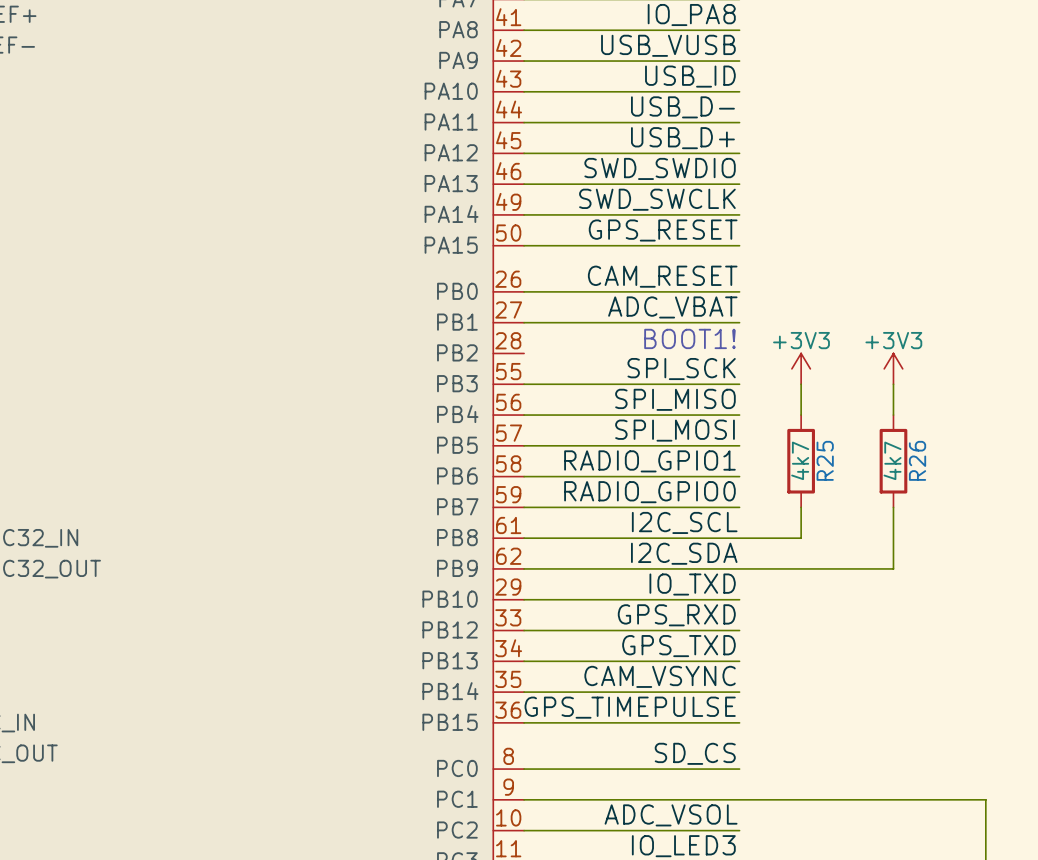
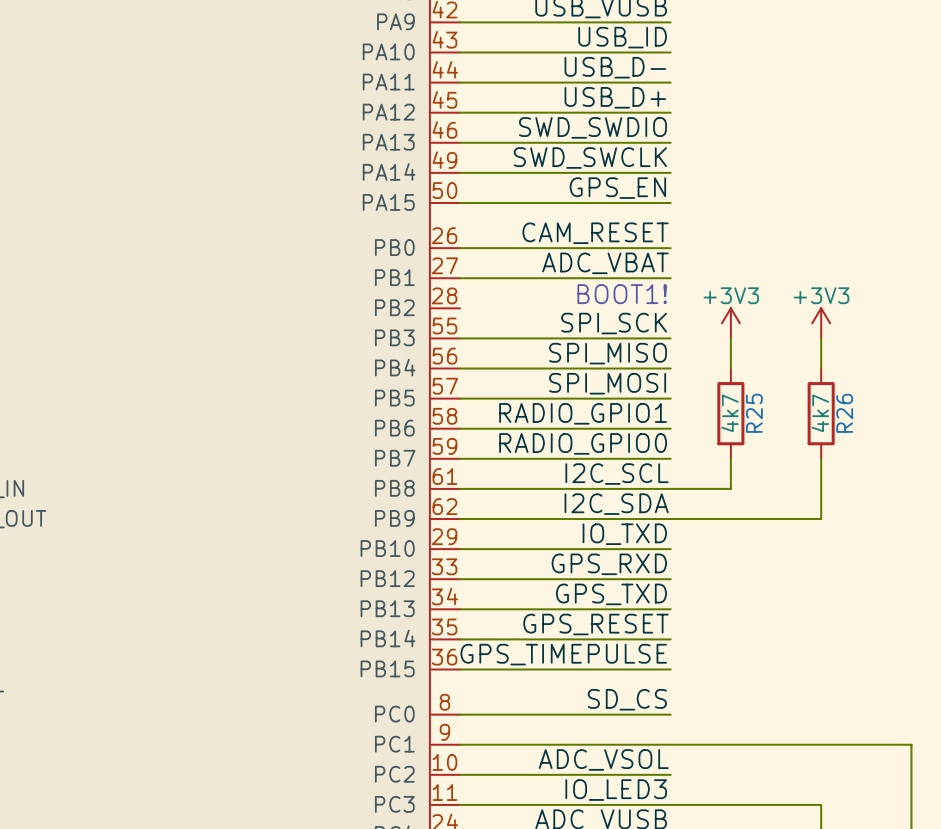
label: GPS_RESET (663, 230) -> GPS_EN (617, 188)
label: CAM_VSYNC (660, 676) -> GPS_RESET (595, 624)

